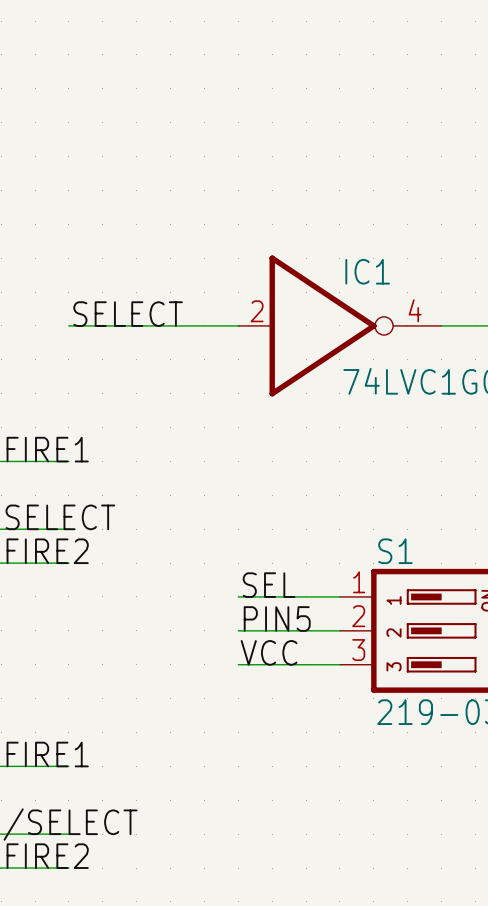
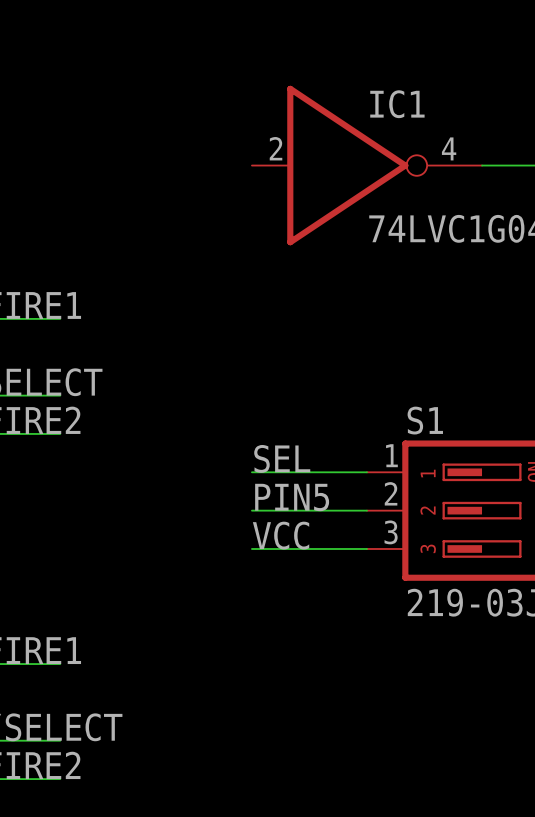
label: SELECT (128, 314) -> none
wire: (68, 325) (238, 325) -> none

